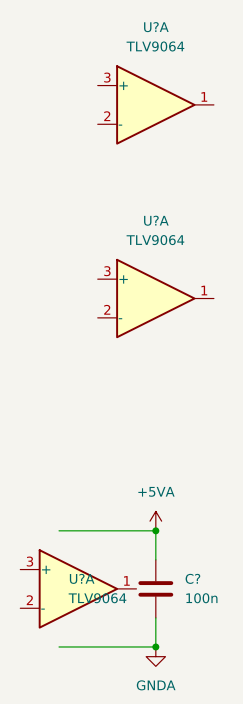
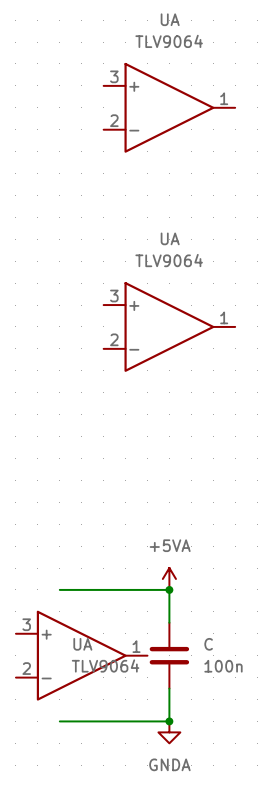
U?A name: U?A (156, 27) -> UA (170, 19)
U?A name: U?A (156, 220) -> UA (170, 238)
U?A name: U?A (82, 578) -> UA (82, 644)
C? name: C? (192, 578) -> C (208, 644)

